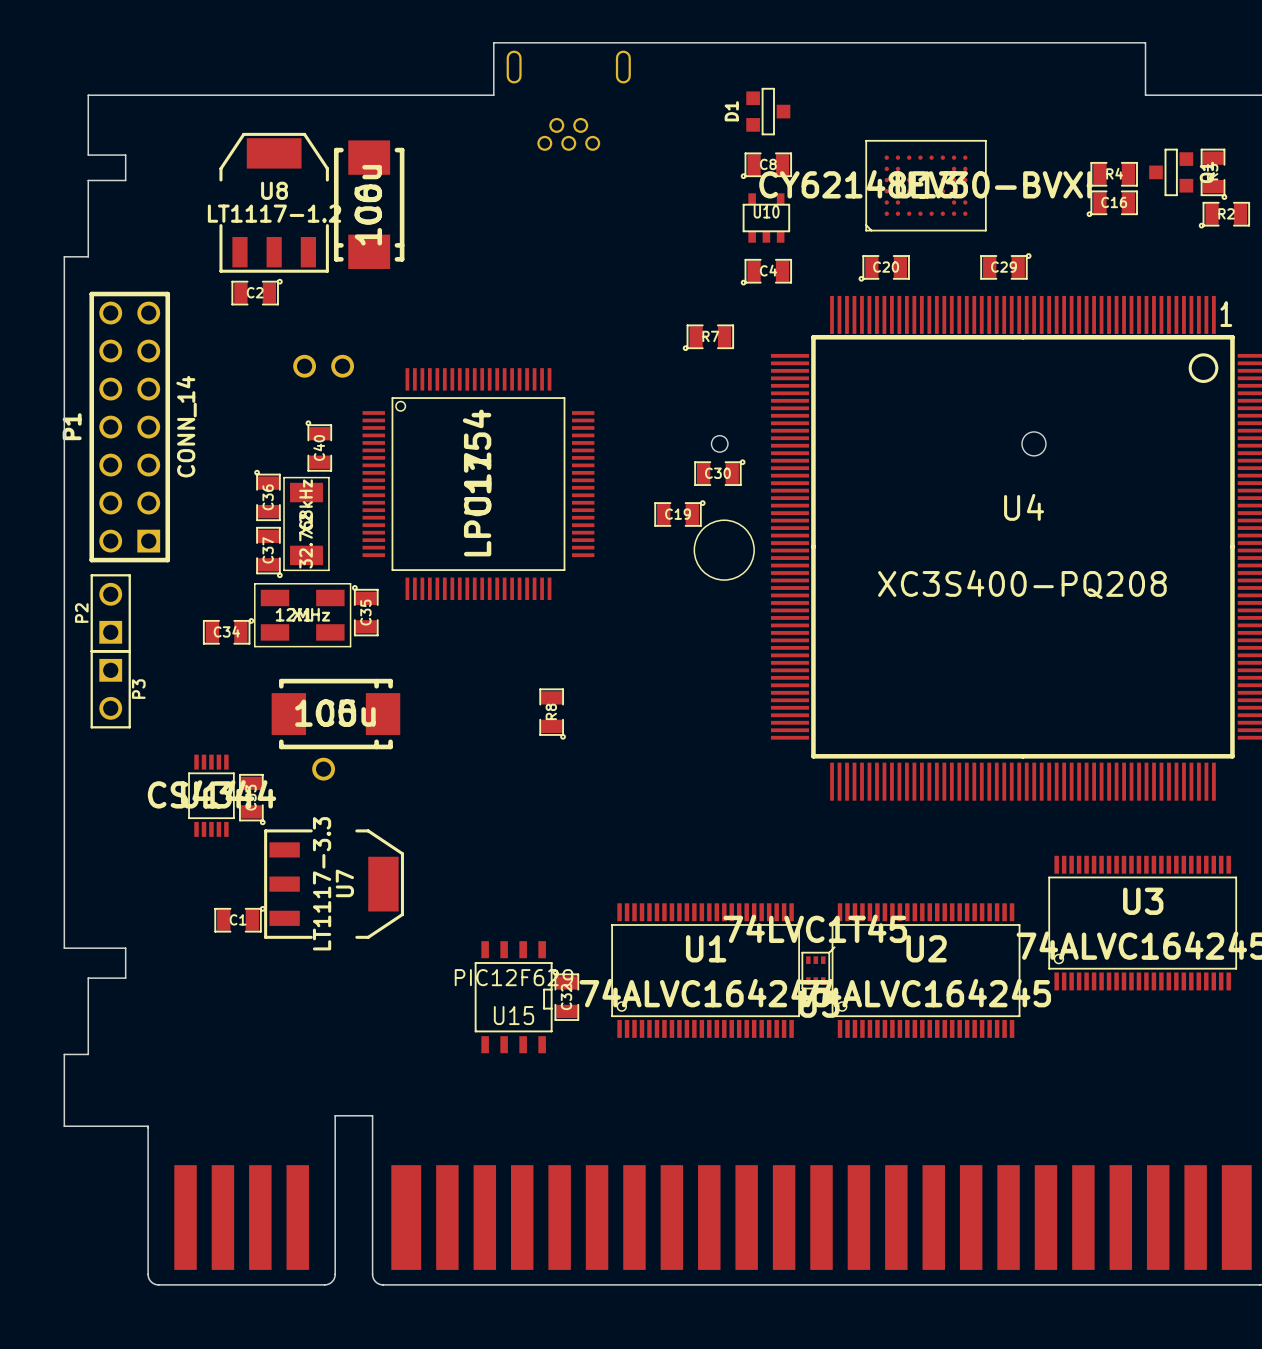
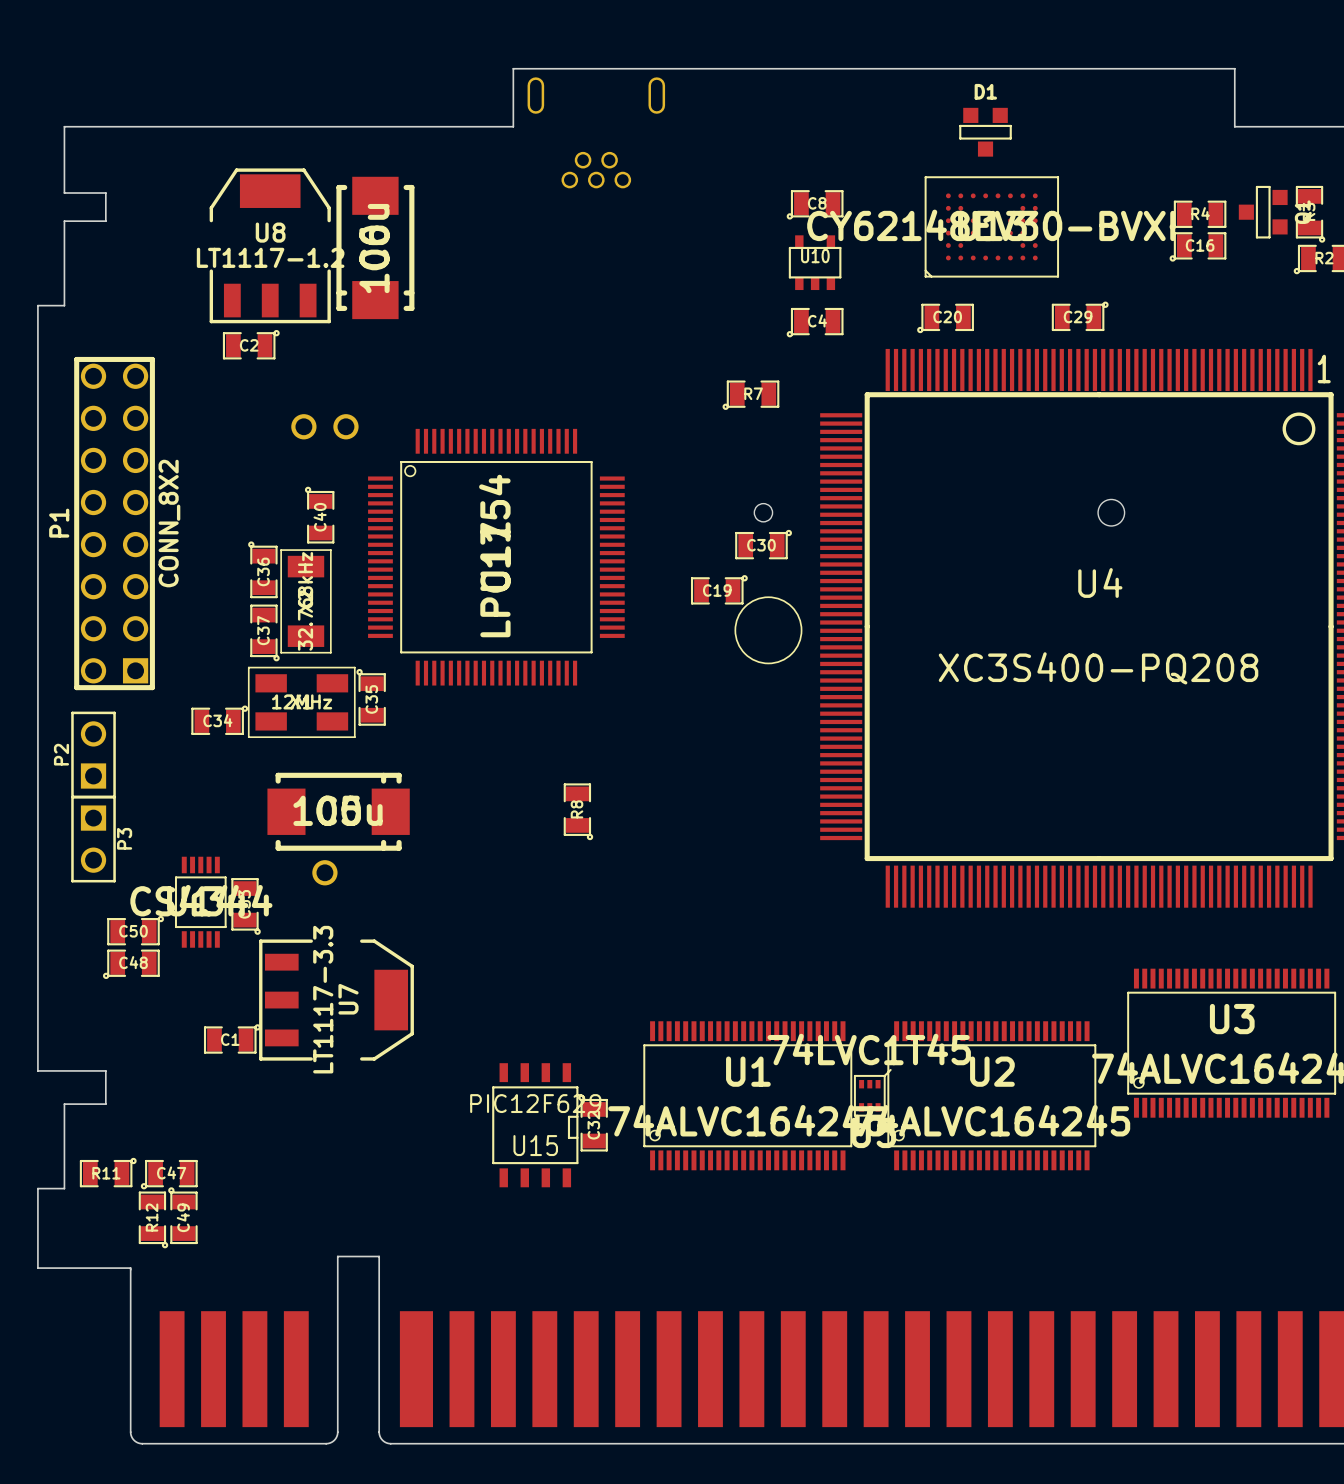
D1 rotation: 0° (768, 111) -> 90° clockwise (985, 132)
D1 position: (768, 111) -> (985, 132)
P1 footprint: [89, 291, 171, 563] -> [74, 356, 155, 691]
P1 value: CONN_14 (186, 426) -> CONN_8X2 (169, 523)
P2 position: (110, 613) -> (93, 754)
P3 position: (110, 689) -> (93, 839)
C50: none -> (135, 930)
C48: none -> (131, 964)
R11: none -> (108, 1172)
C47: none -> (169, 1174)
C49: none -> (182, 1215)
R12: none -> (153, 1219)

